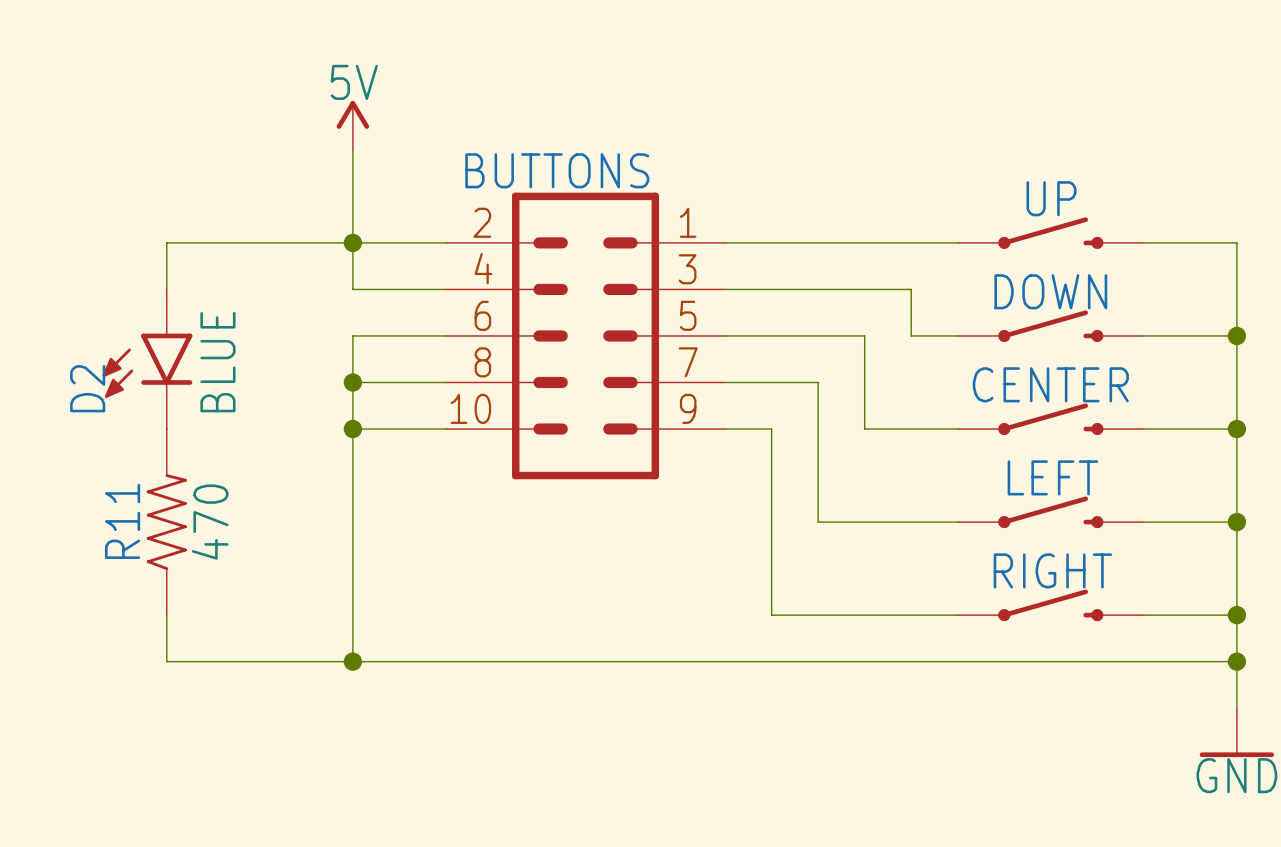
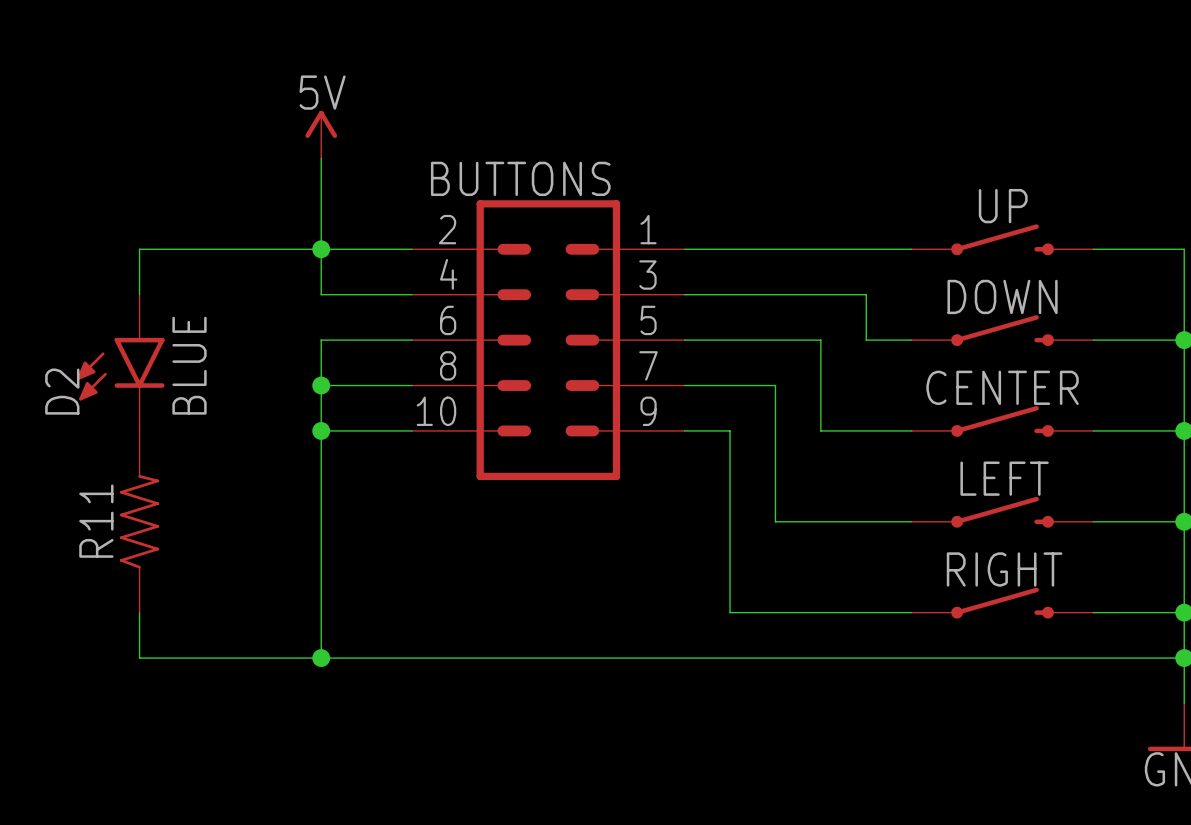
R11 value: 470 (210, 522) -> none

